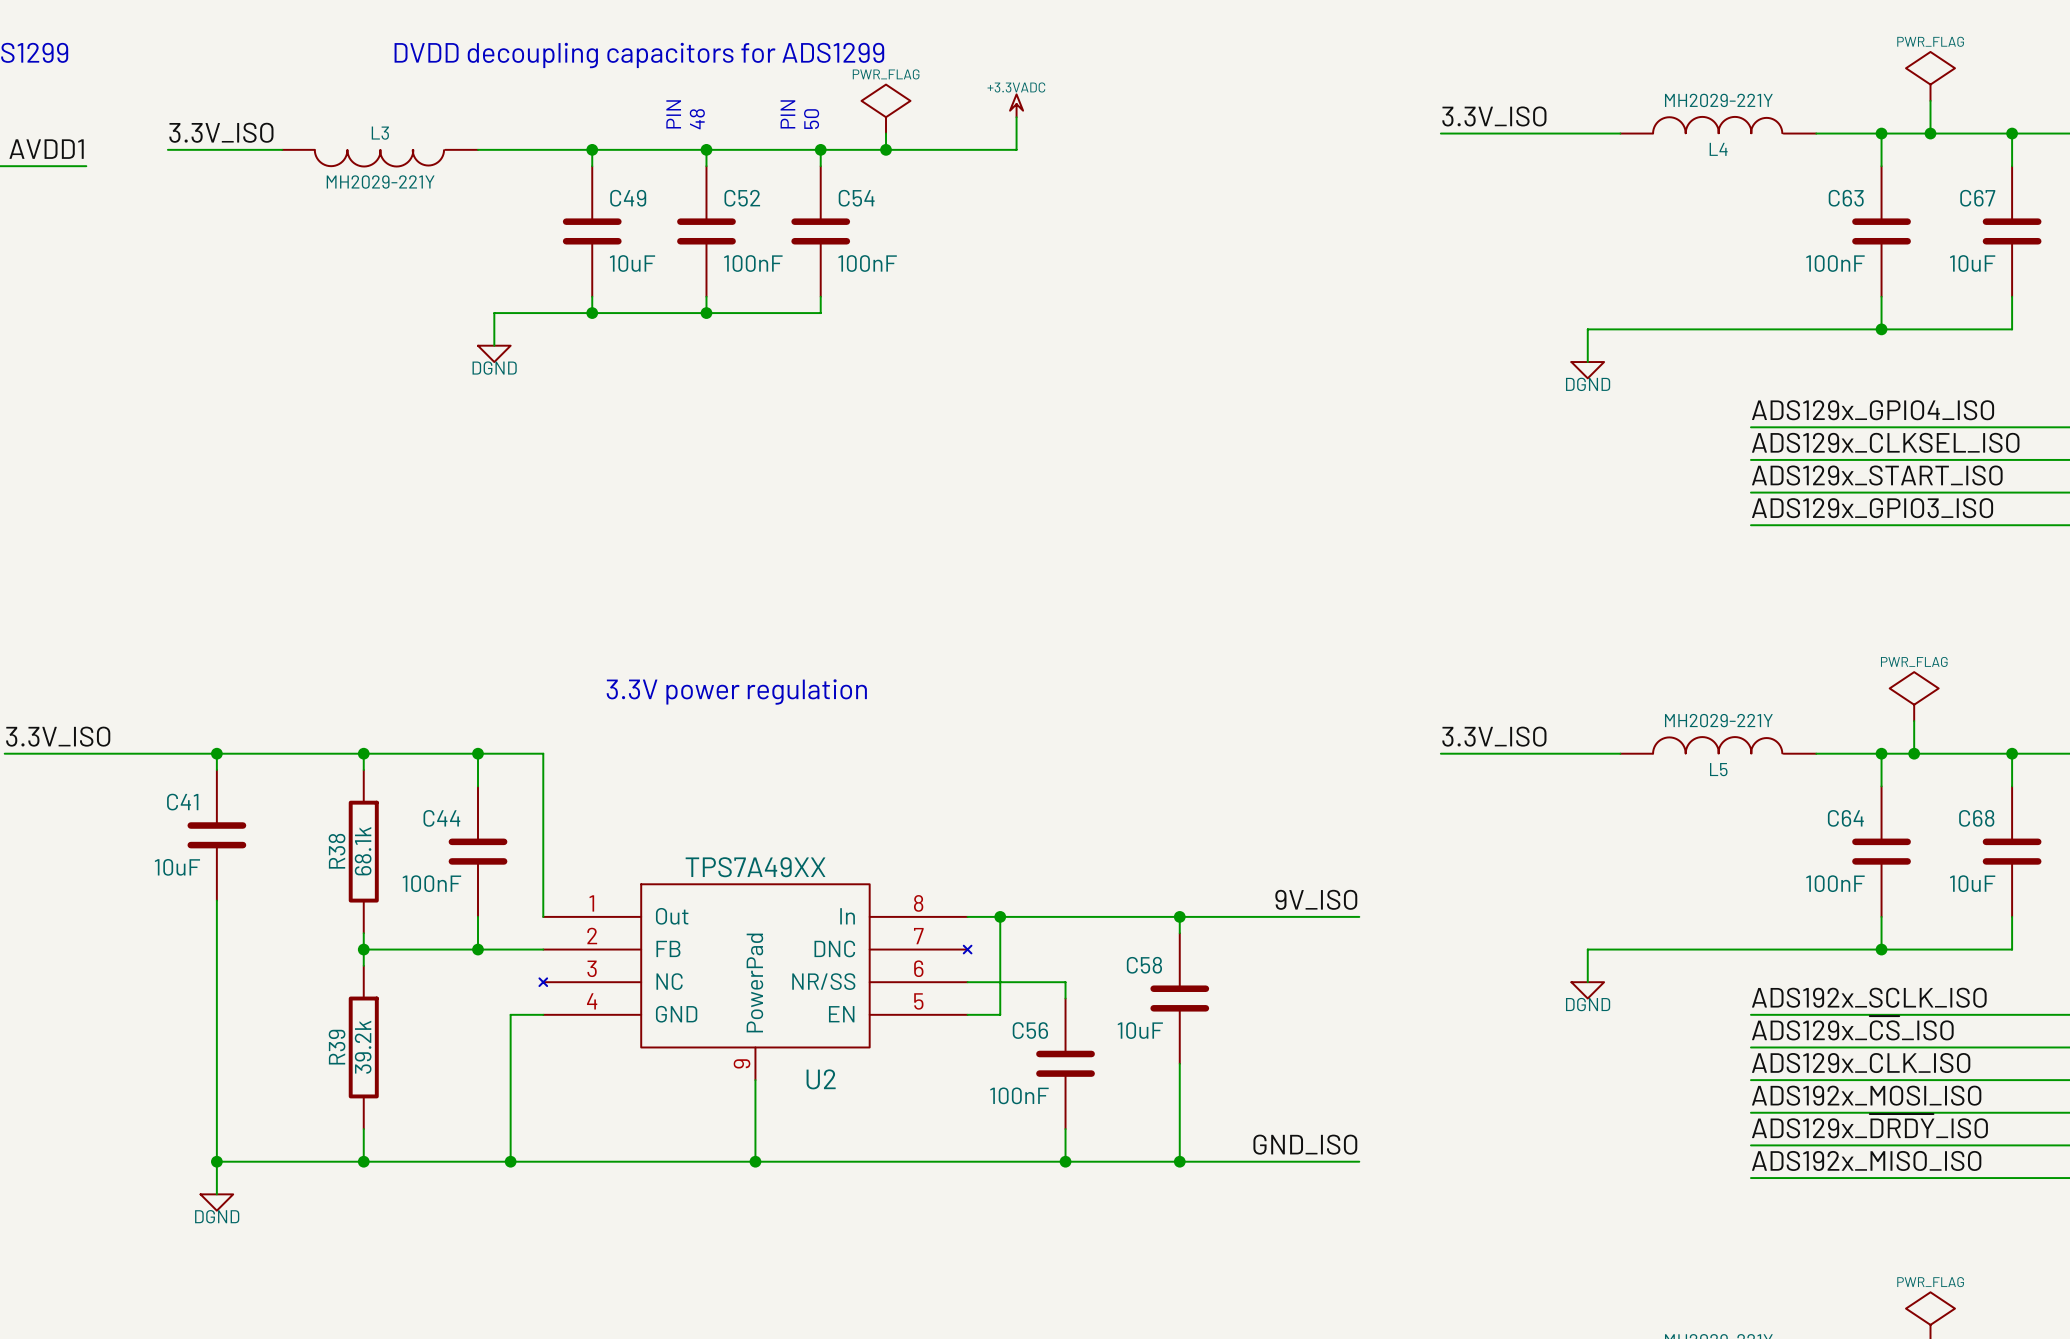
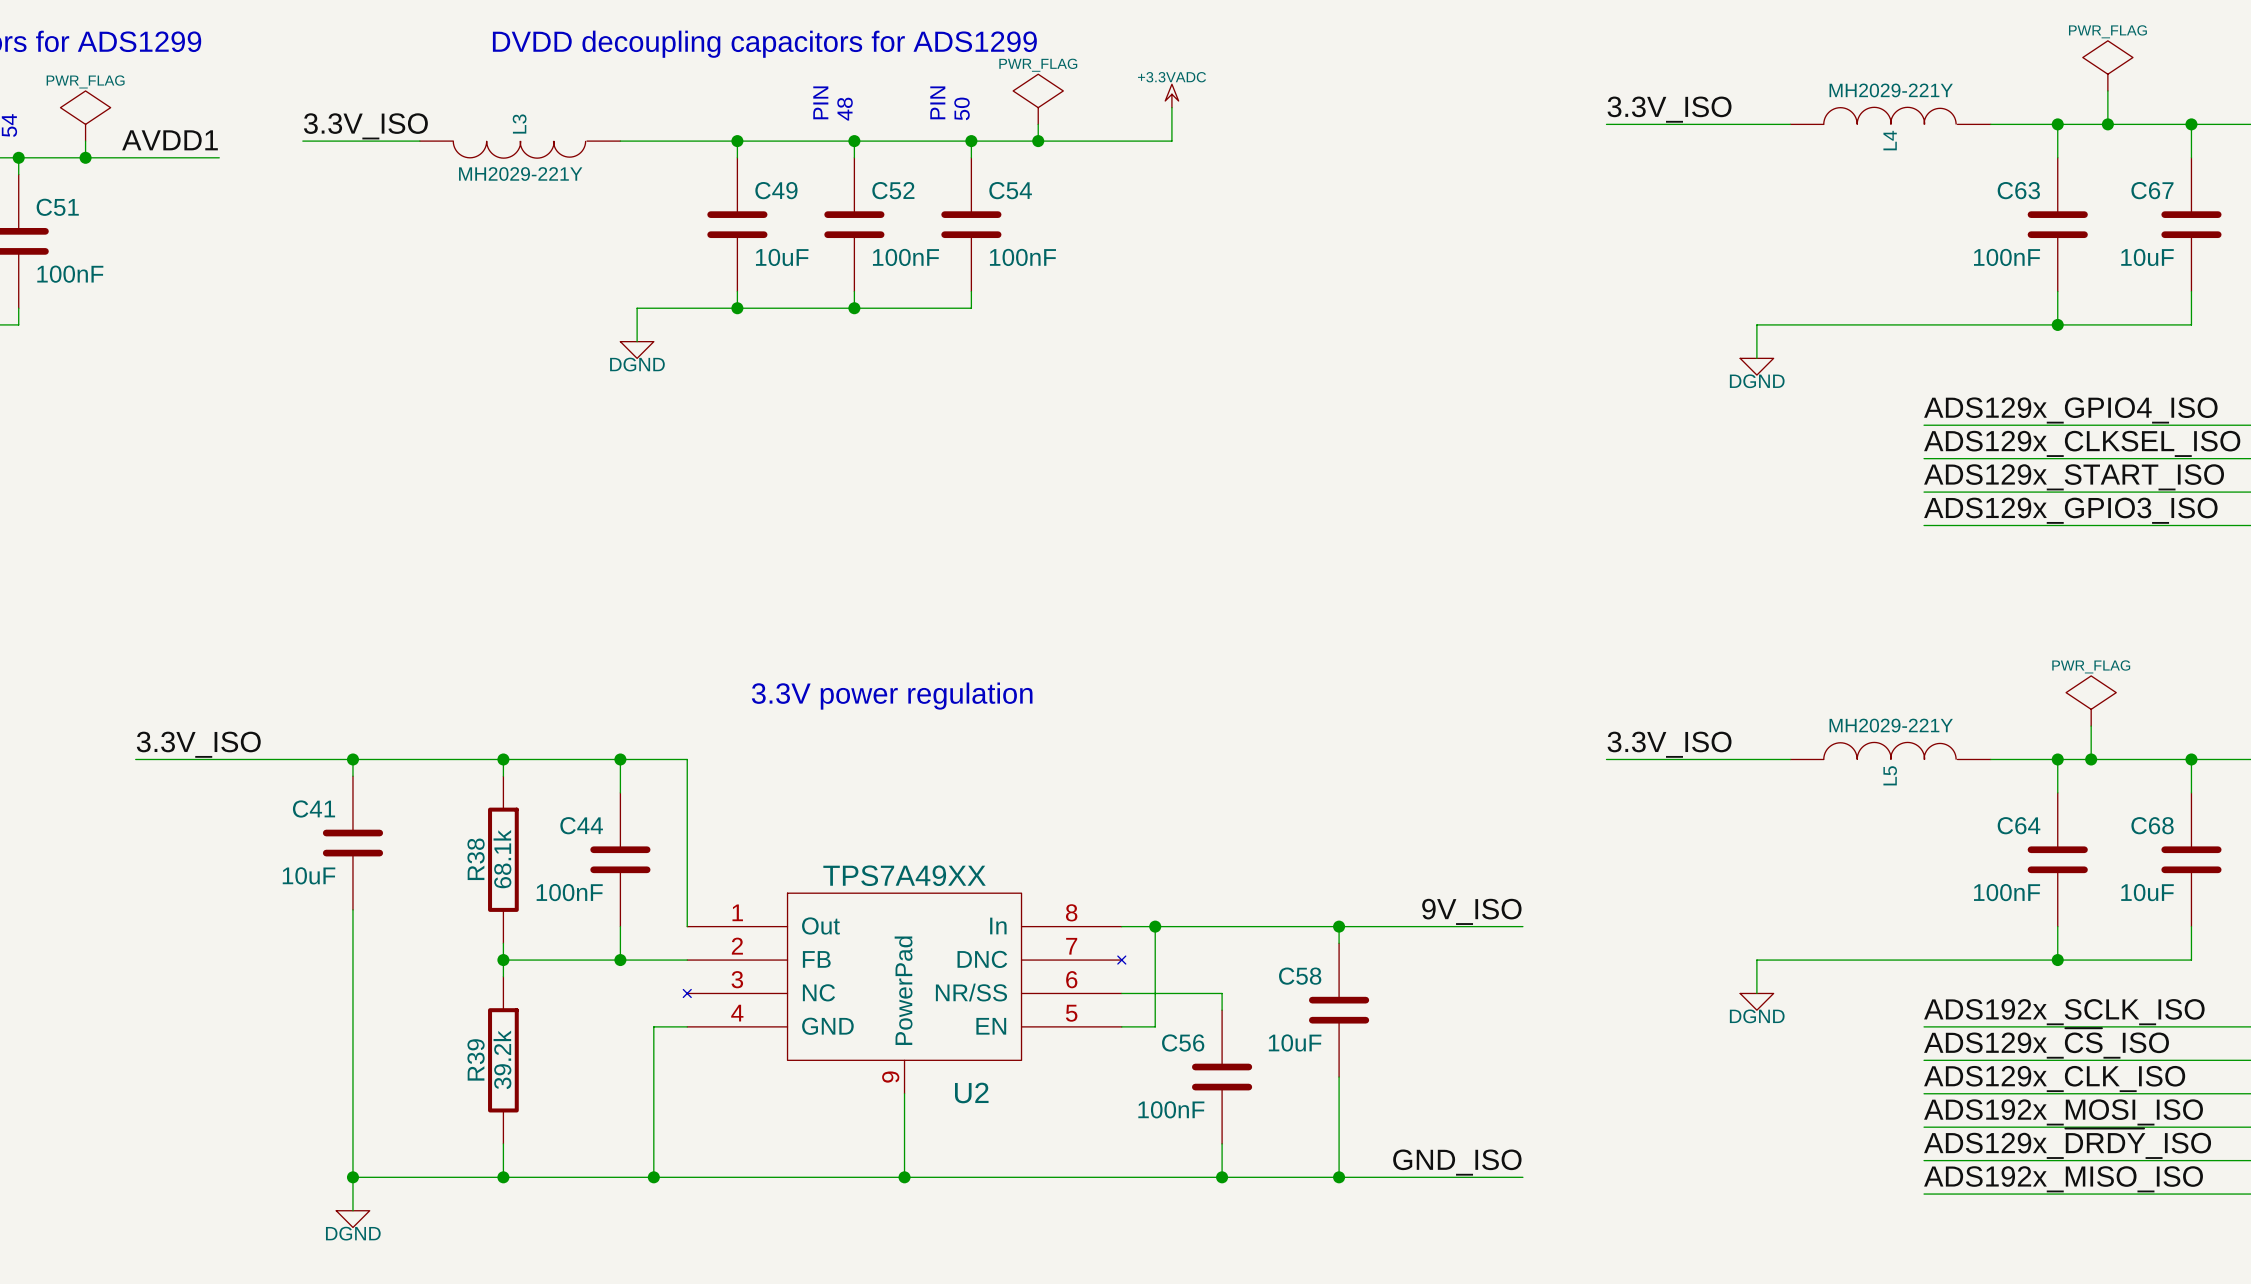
L3 name rotation: 0° (380, 133) -> 90° counterclockwise (519, 124)
L4 name rotation: 0° (1718, 149) -> 90° counterclockwise (1890, 140)
L5 name rotation: 0° (1718, 769) -> 90° counterclockwise (1890, 775)

